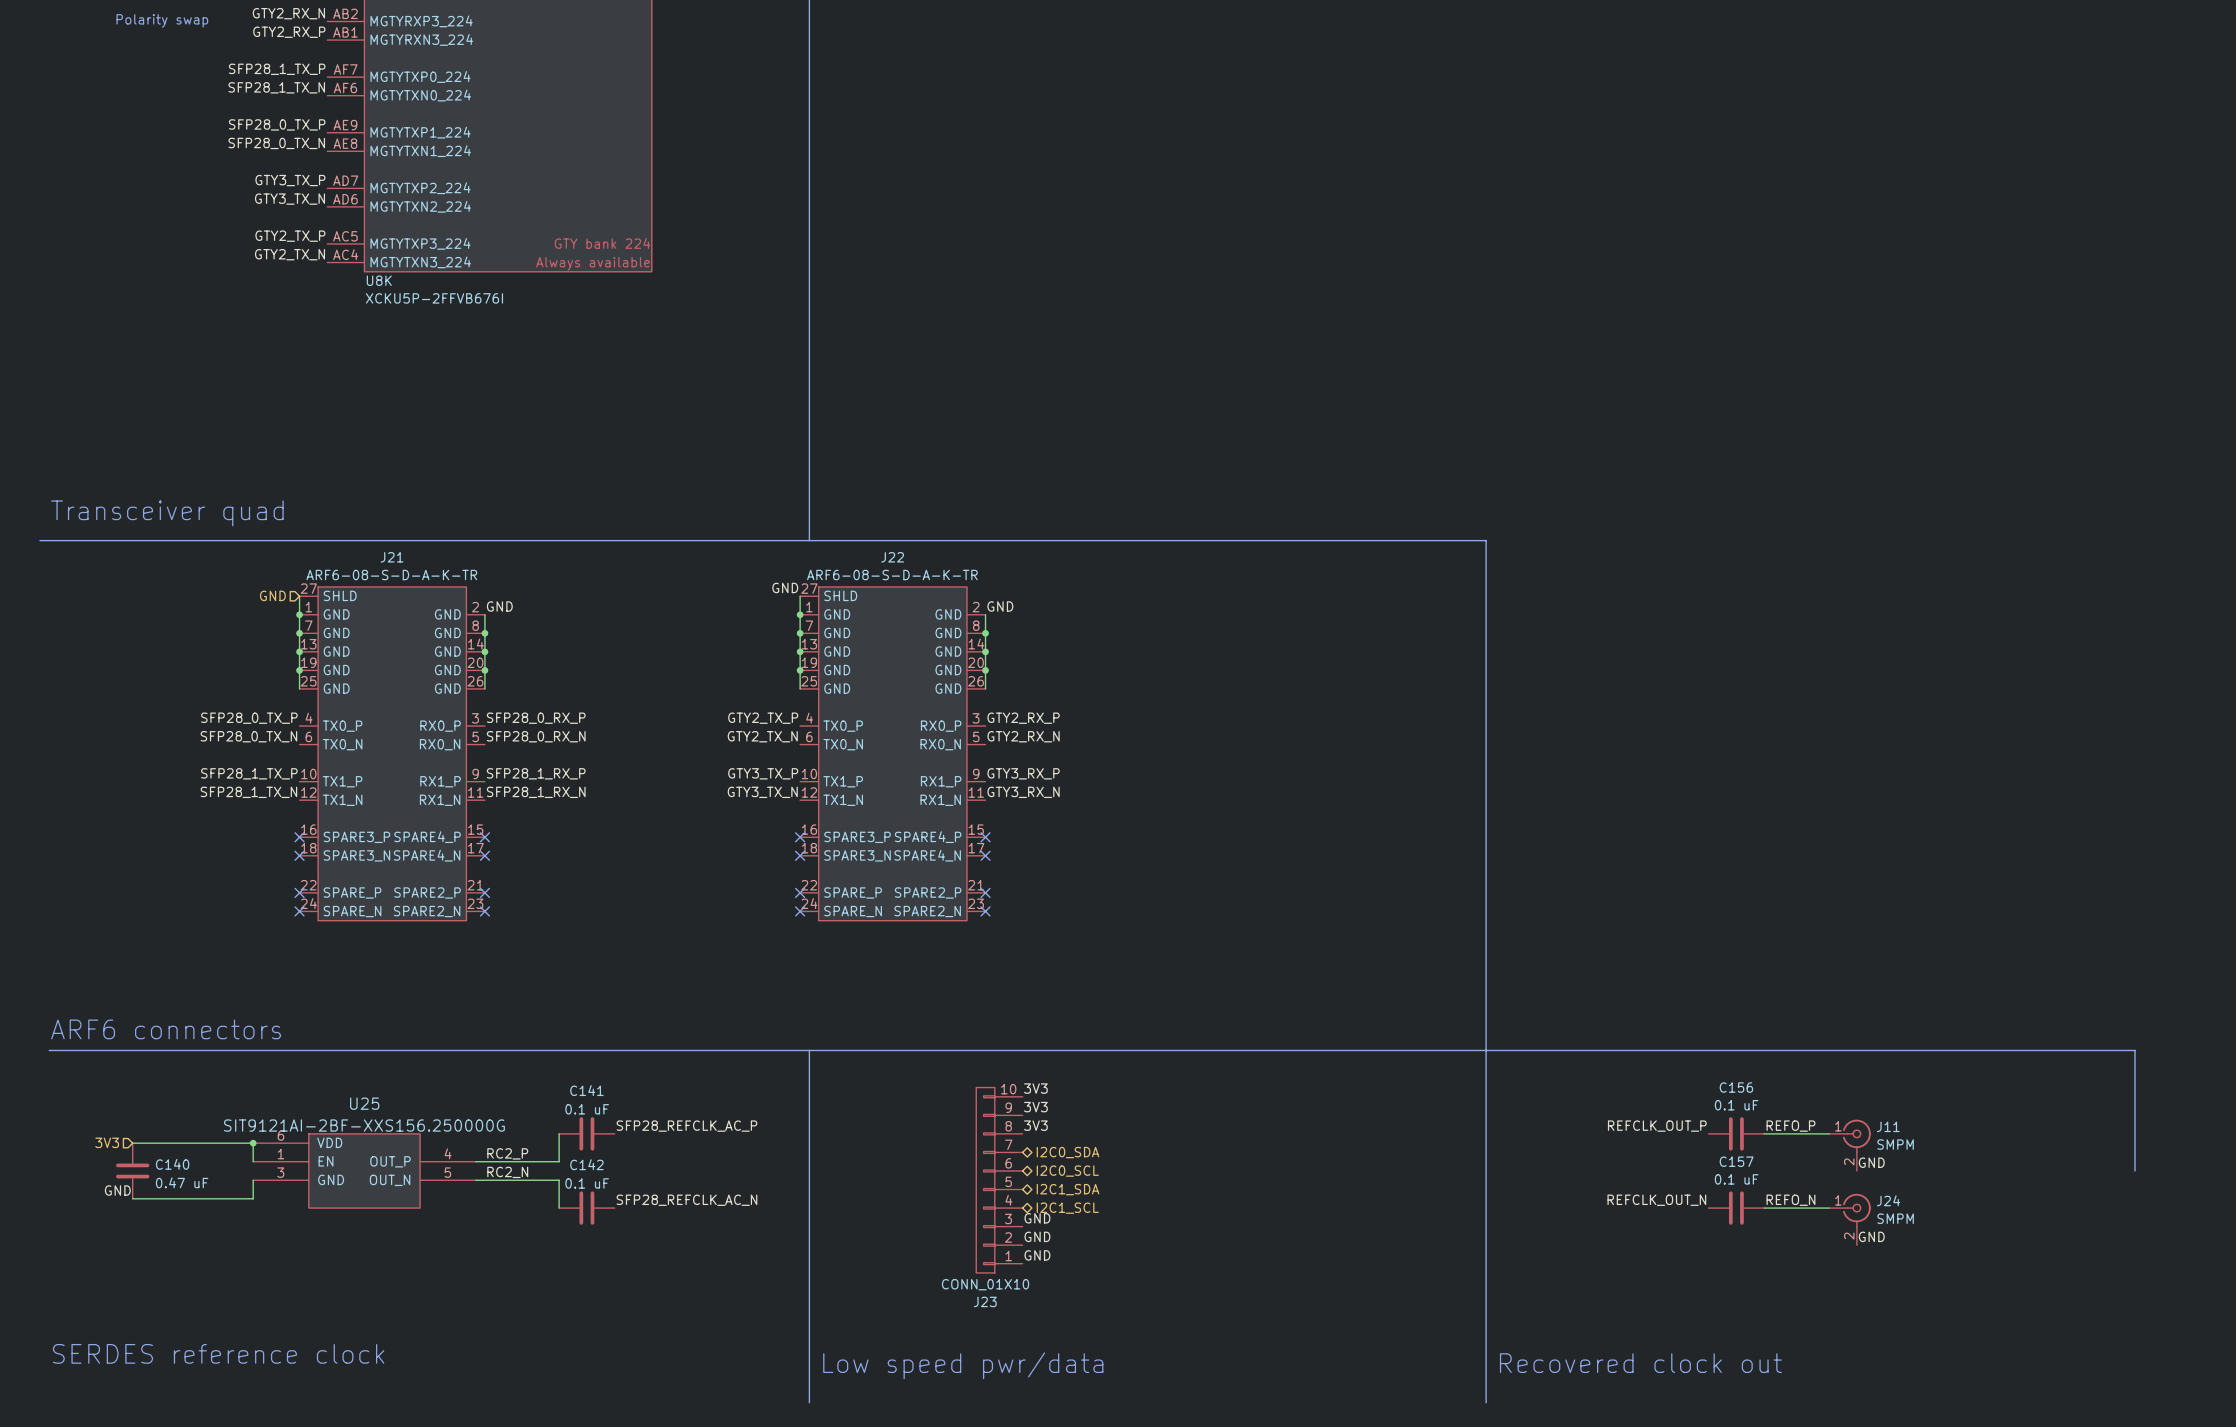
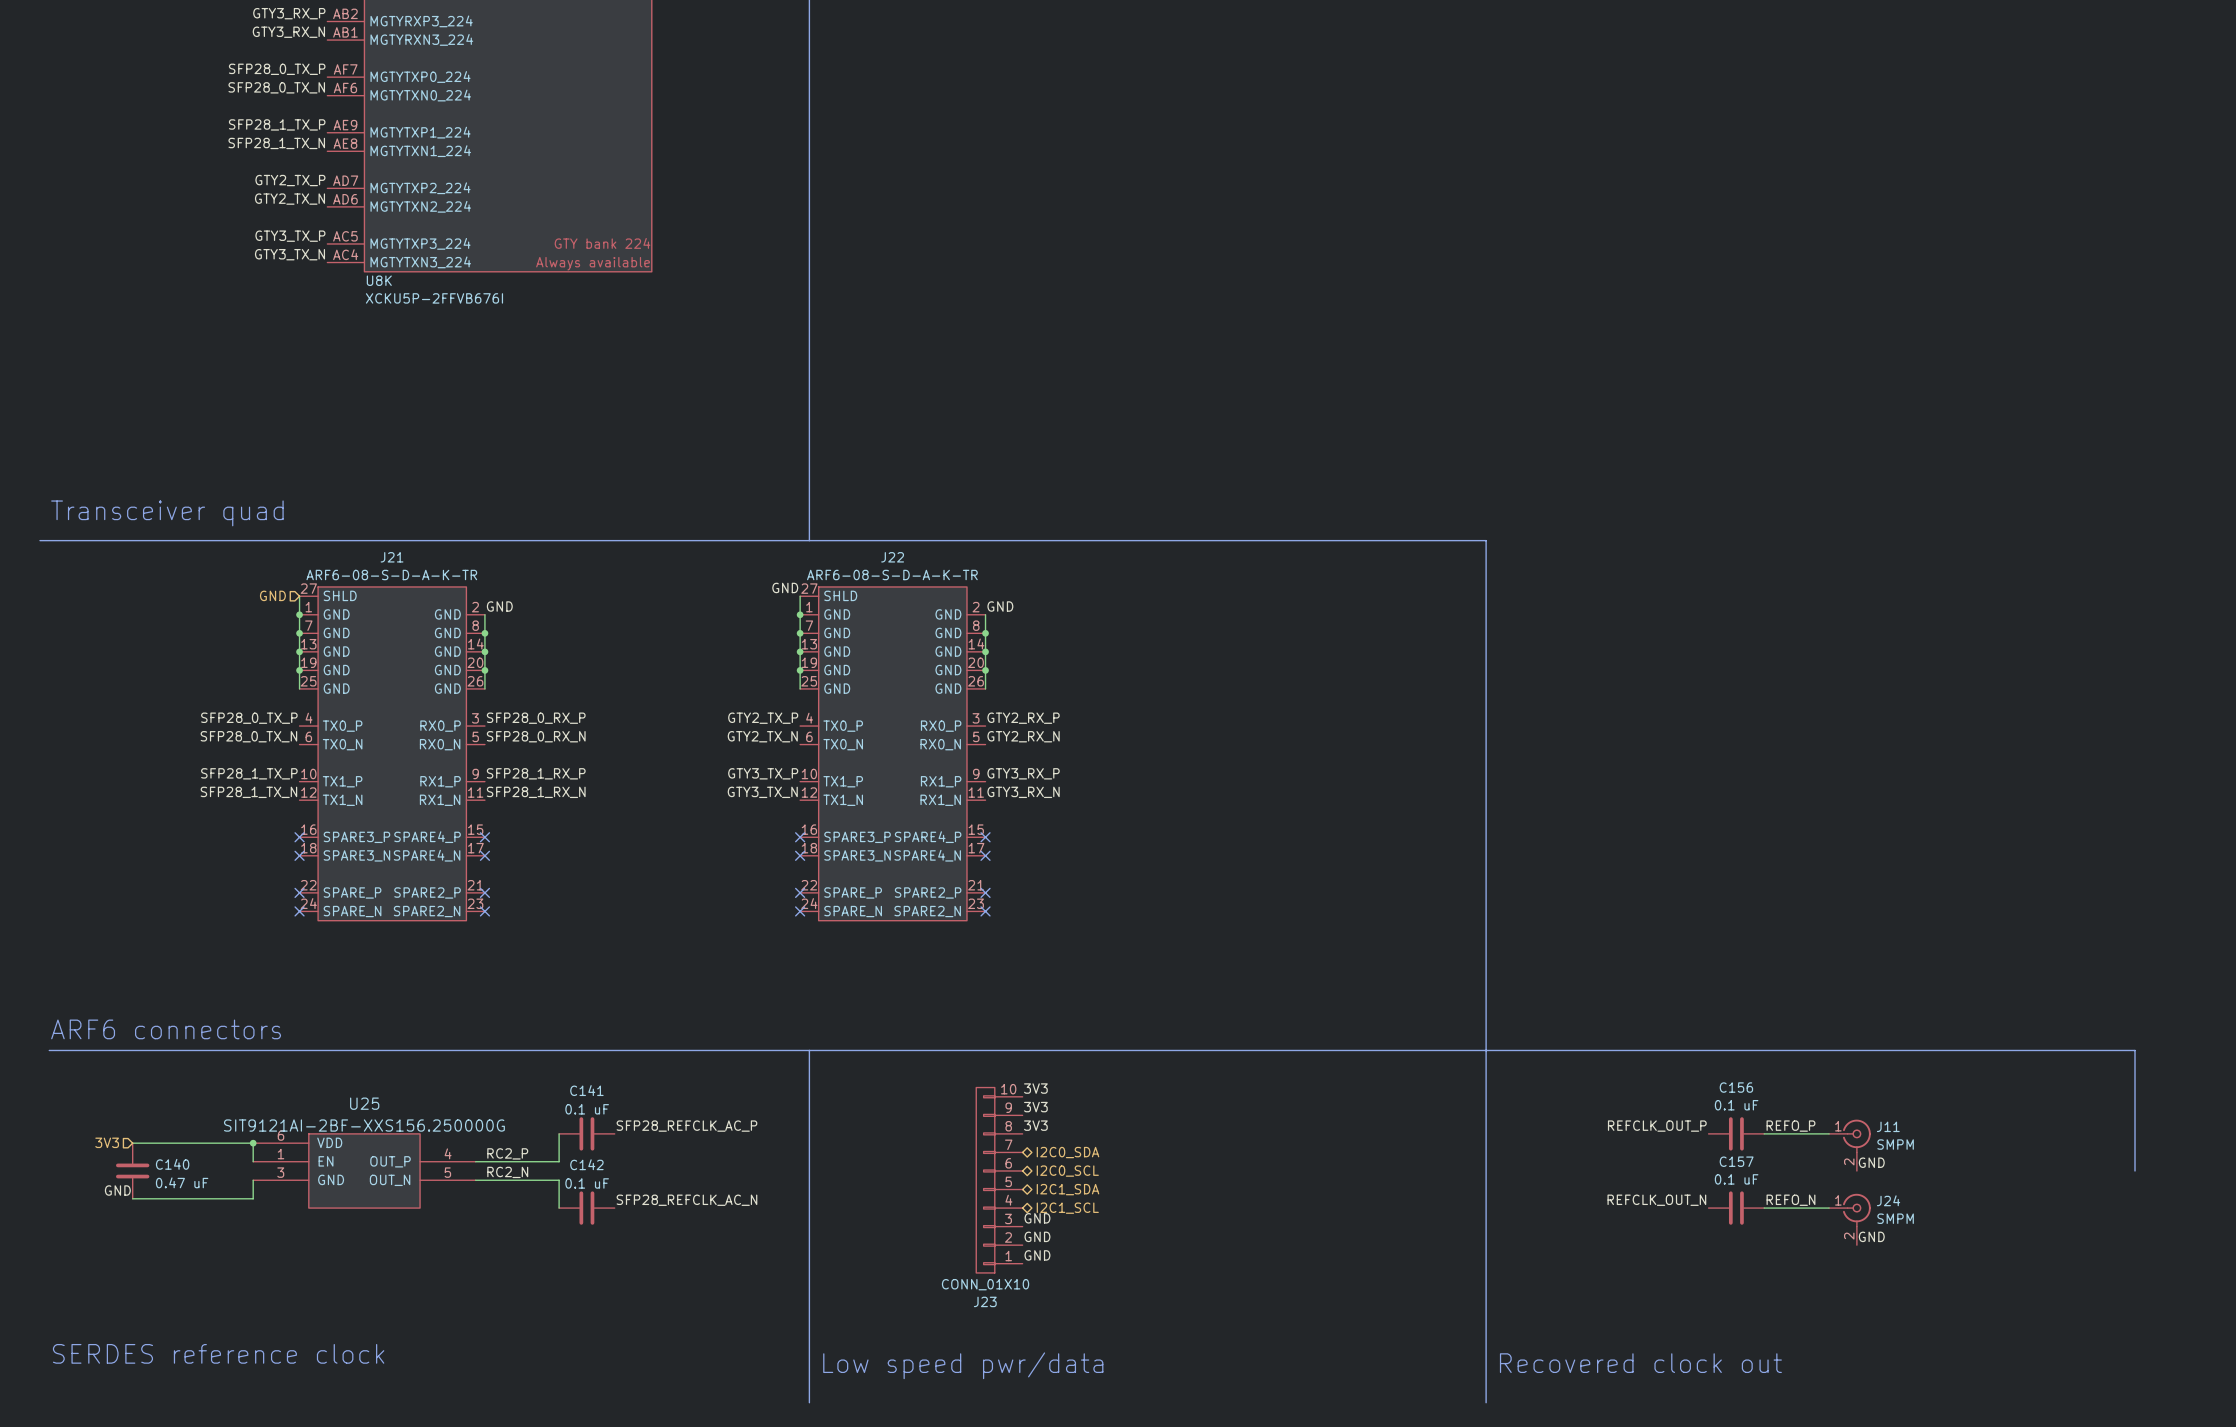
label: GTY2_RX_N (288, 13) -> GTY3_RX_P (289, 13)
text: Polarity swap (162, 20) -> none
label: GTY2_RX_P (289, 32) -> GTY3_RX_N (288, 32)
label: SFP28_1_TX_P (277, 69) -> SFP28_0_TX_P (277, 69)
label: SFP28_1_TX_N (276, 87) -> SFP28_0_TX_N (276, 87)
label: SFP28_0_TX_P (277, 124) -> SFP28_1_TX_P (277, 124)
label: SFP28_0_TX_N (276, 143) -> SFP28_1_TX_N (276, 143)
label: GTY3_TX_P (290, 180) -> GTY2_TX_P (290, 180)
label: GTY3_TX_N (289, 199) -> GTY2_TX_N (289, 199)
label: GTY2_TX_P (290, 236) -> GTY3_TX_P (290, 236)
label: GTY2_TX_N (289, 254) -> GTY3_TX_N (289, 254)

